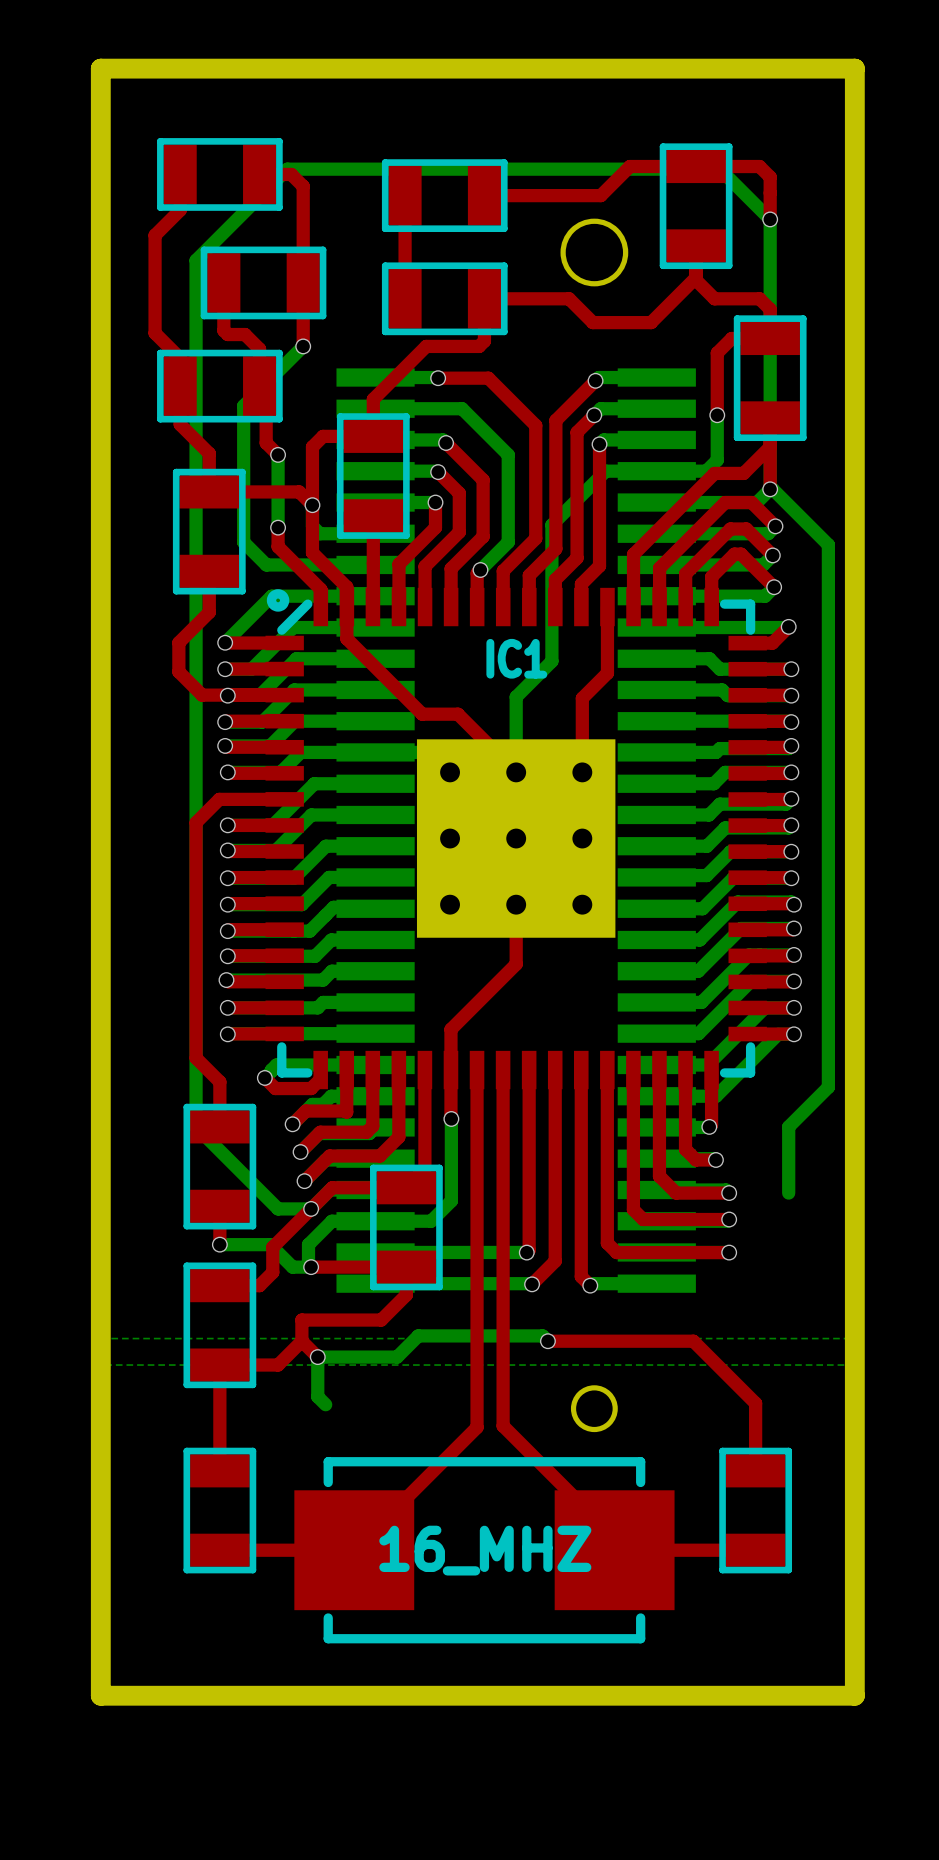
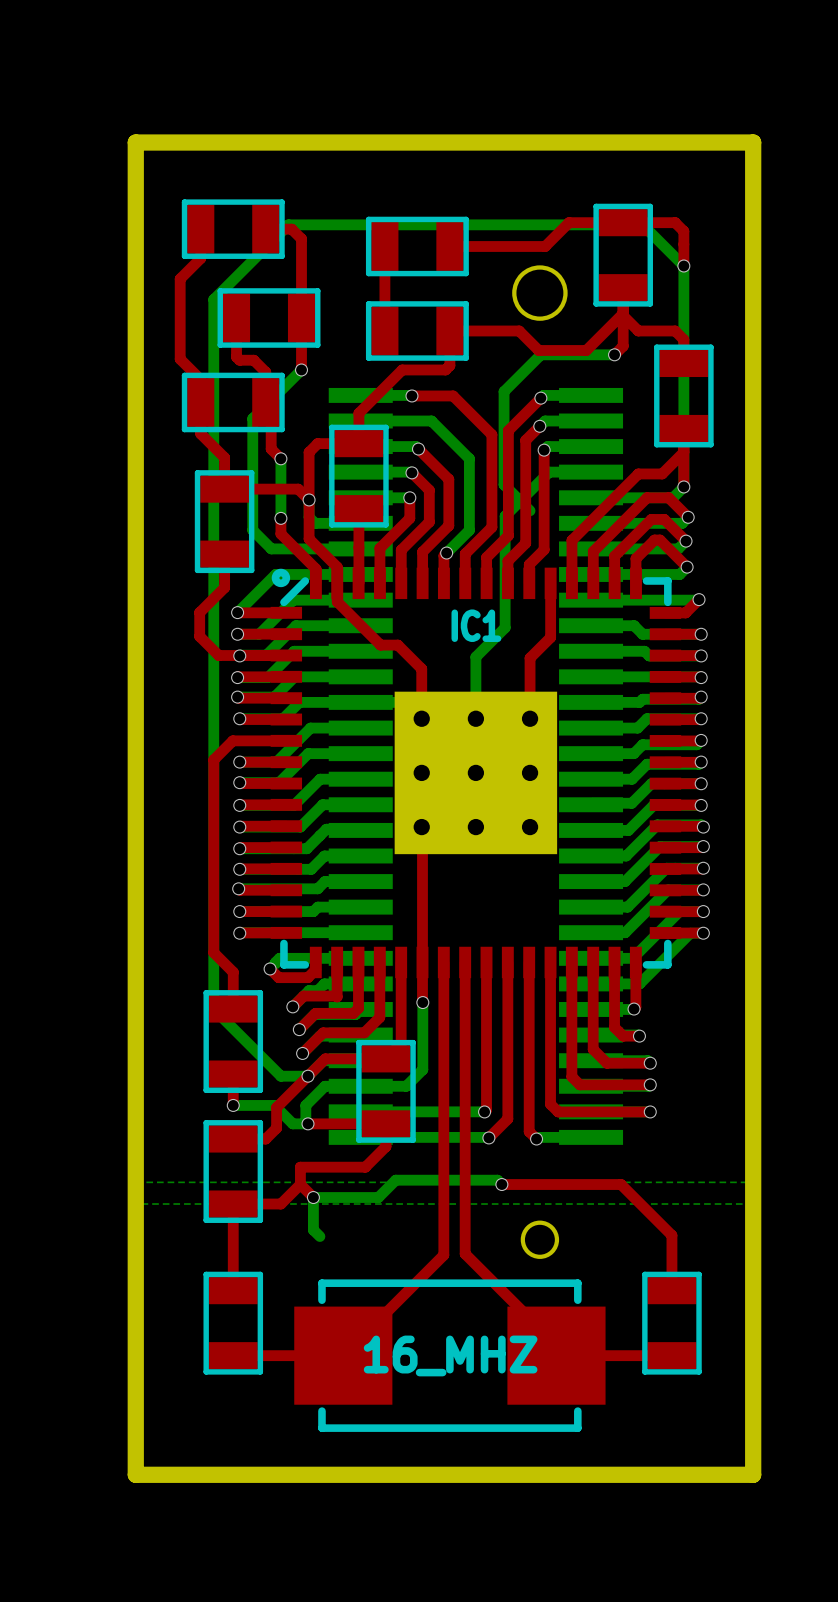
top track: none -> (623, 315) (623, 346) (614, 354)
bottom track: none -> (614, 354) (540, 354) (504, 391) (504, 484) (530, 510)
top track: (770, 338) (731, 338) (717, 353) (717, 415) -> none
bottom track: (717, 415) (717, 460) (706, 471) (656, 471) -> none
via position: (717, 415) -> (614, 354)
bottom track: (770, 489) (772, 489) (828, 544) (828, 1087) (788, 1126) (788, 1193) -> none
top track: (346, 629) (346, 638) (422, 714) (457, 714) (516, 772) -> (337, 601) (380, 645) (397, 645) (421, 668) (421, 772)
top track: (516, 838) (516, 964) (450, 1029) -> (475, 827) (421, 827) (422, 929)

